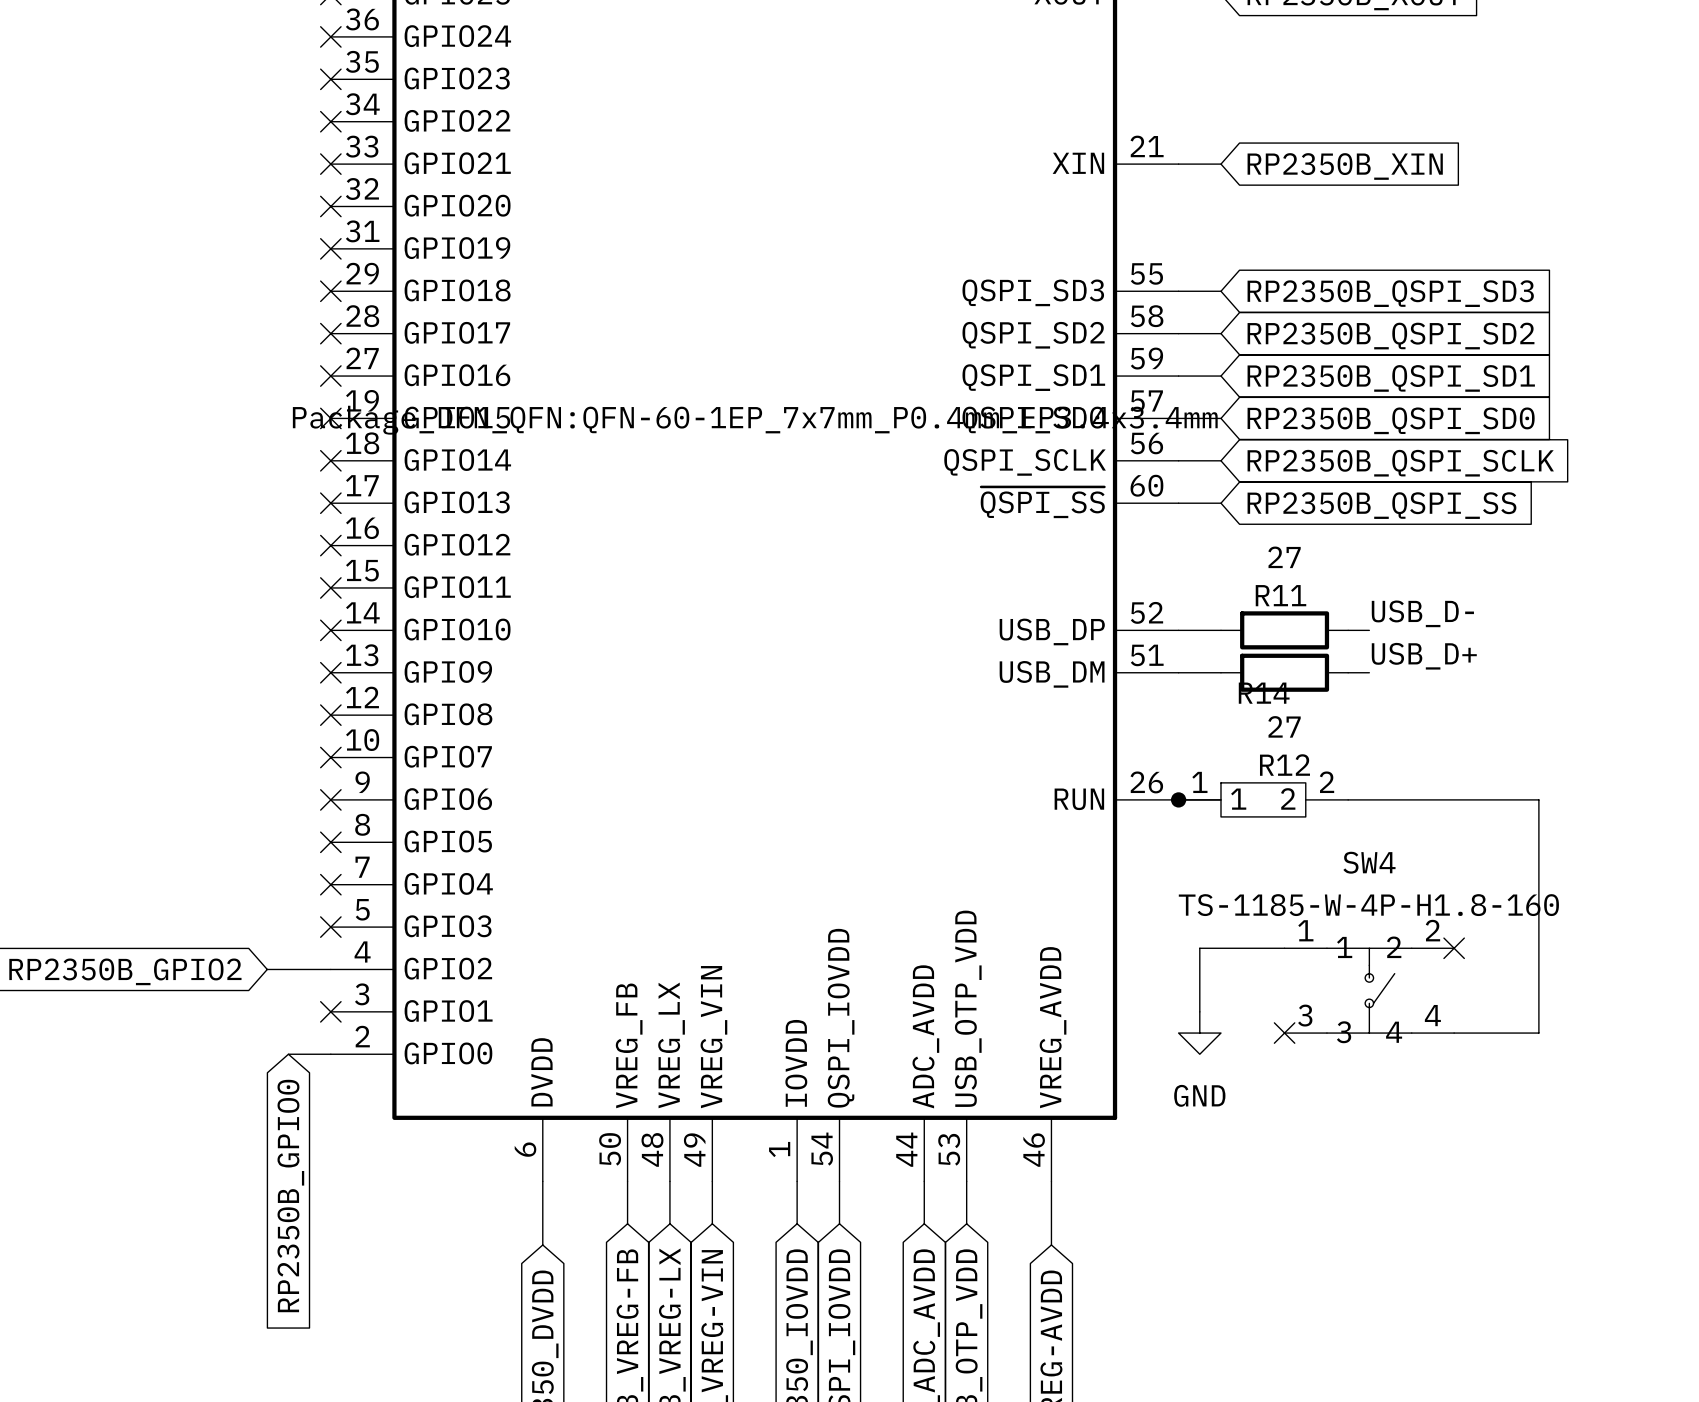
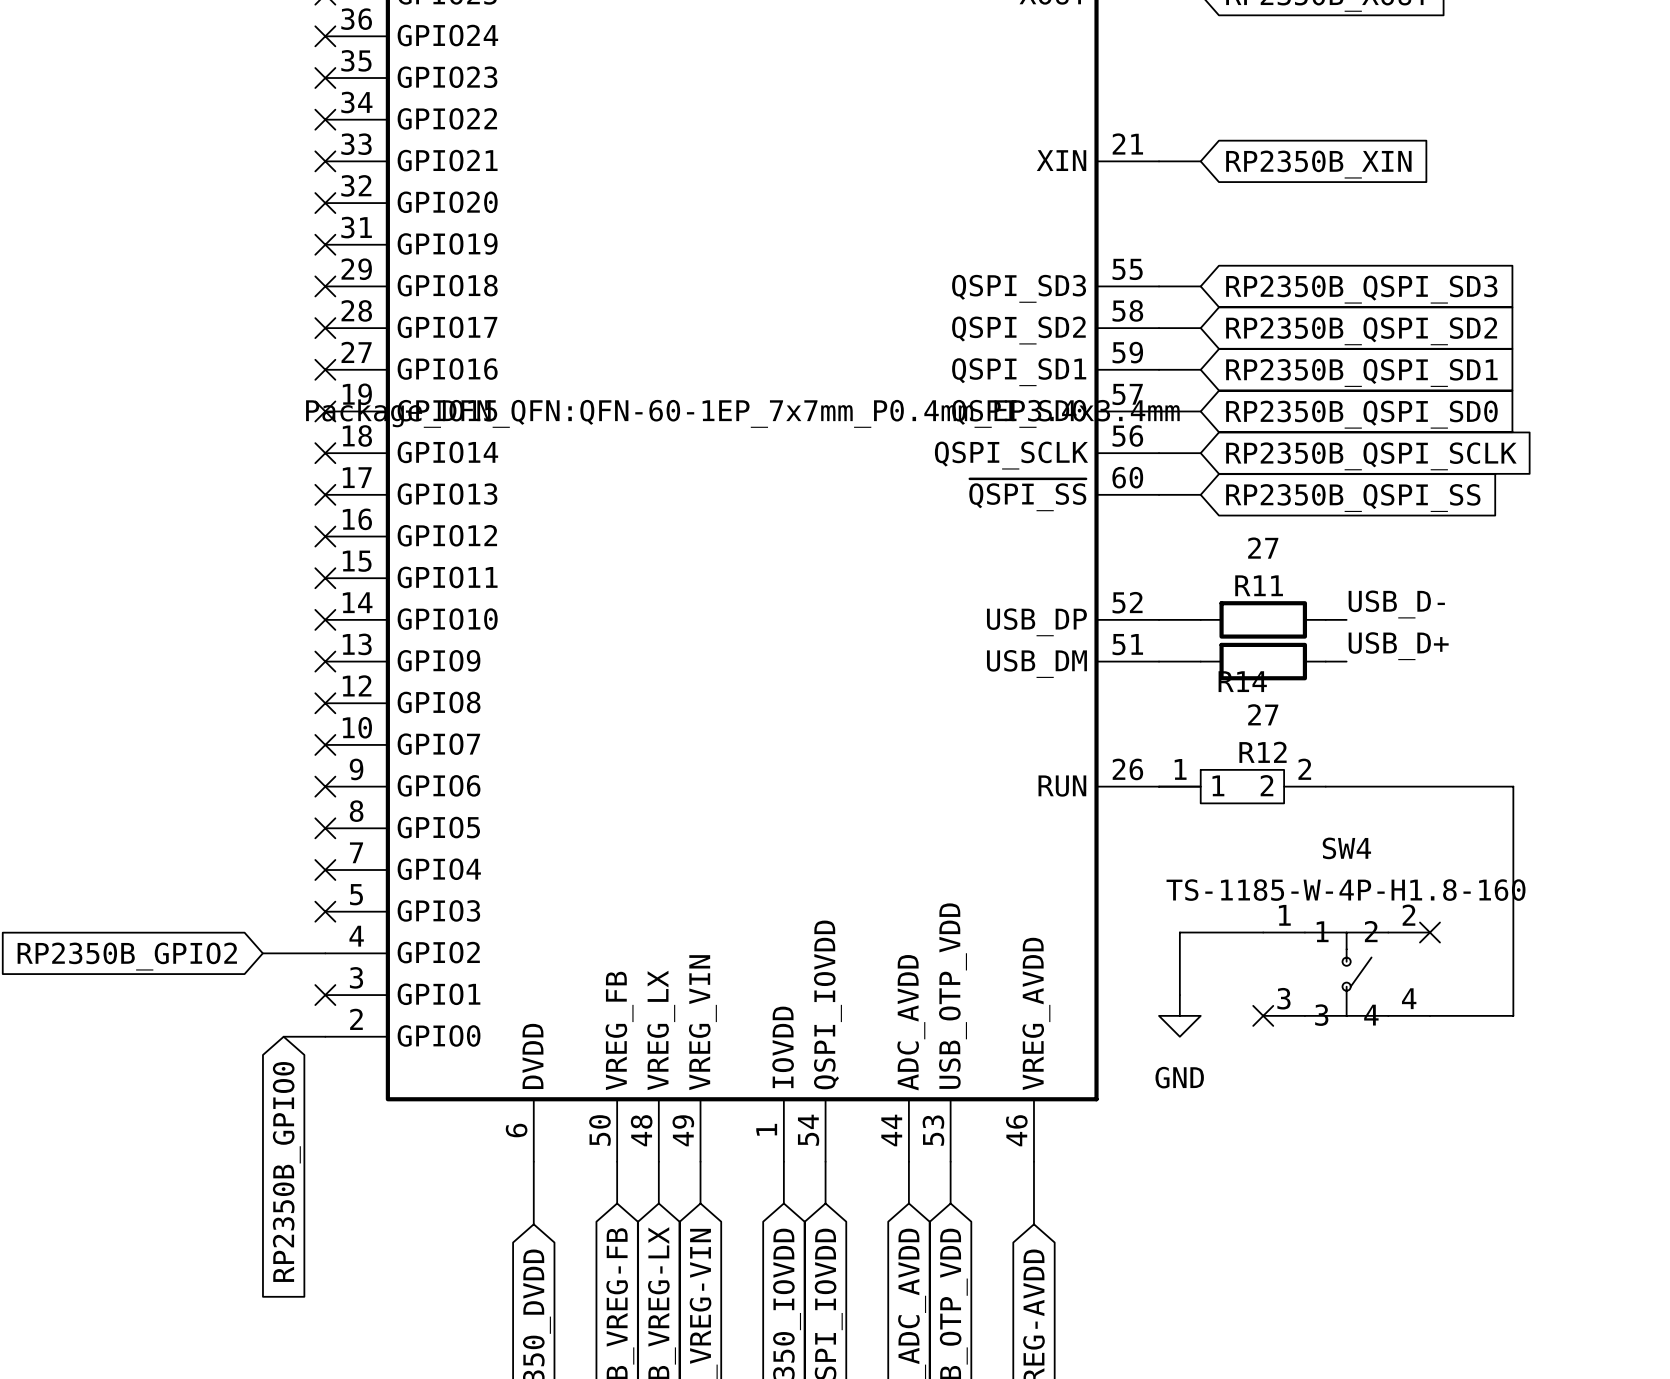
junction: (1178, 799) -> none

